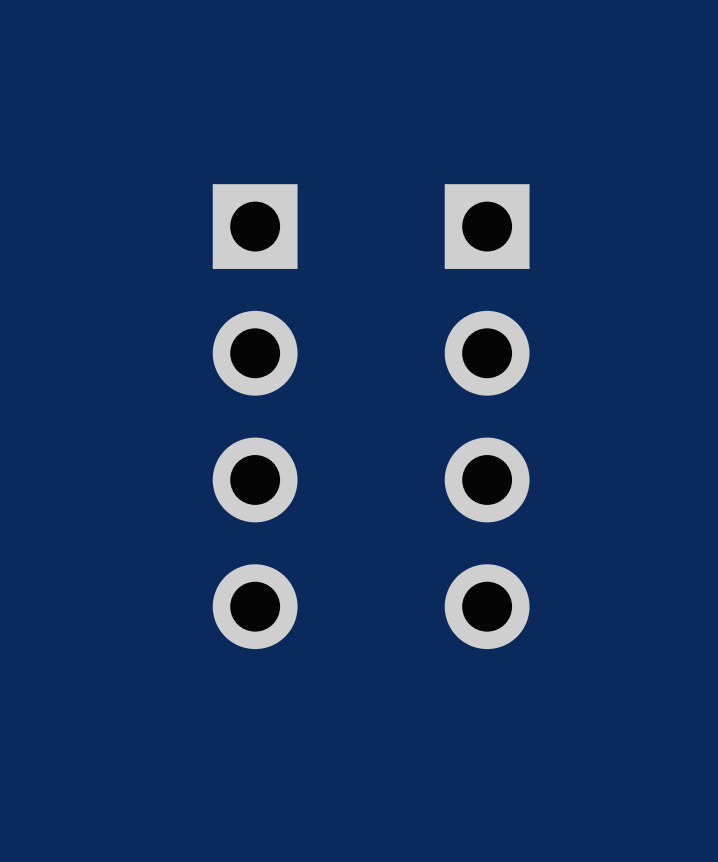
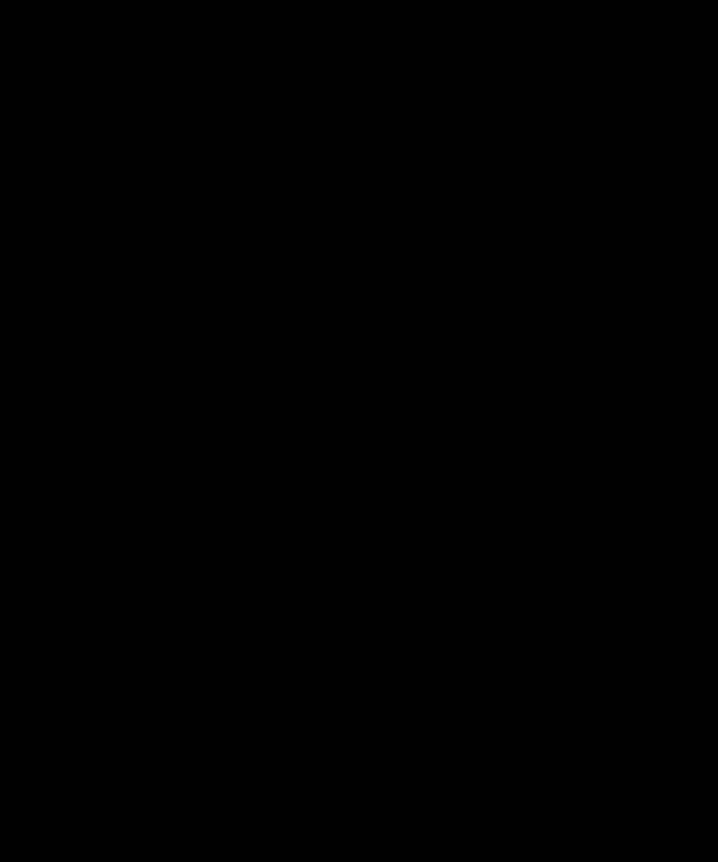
part: (255, 416) -> none
part: (487, 416) -> none

